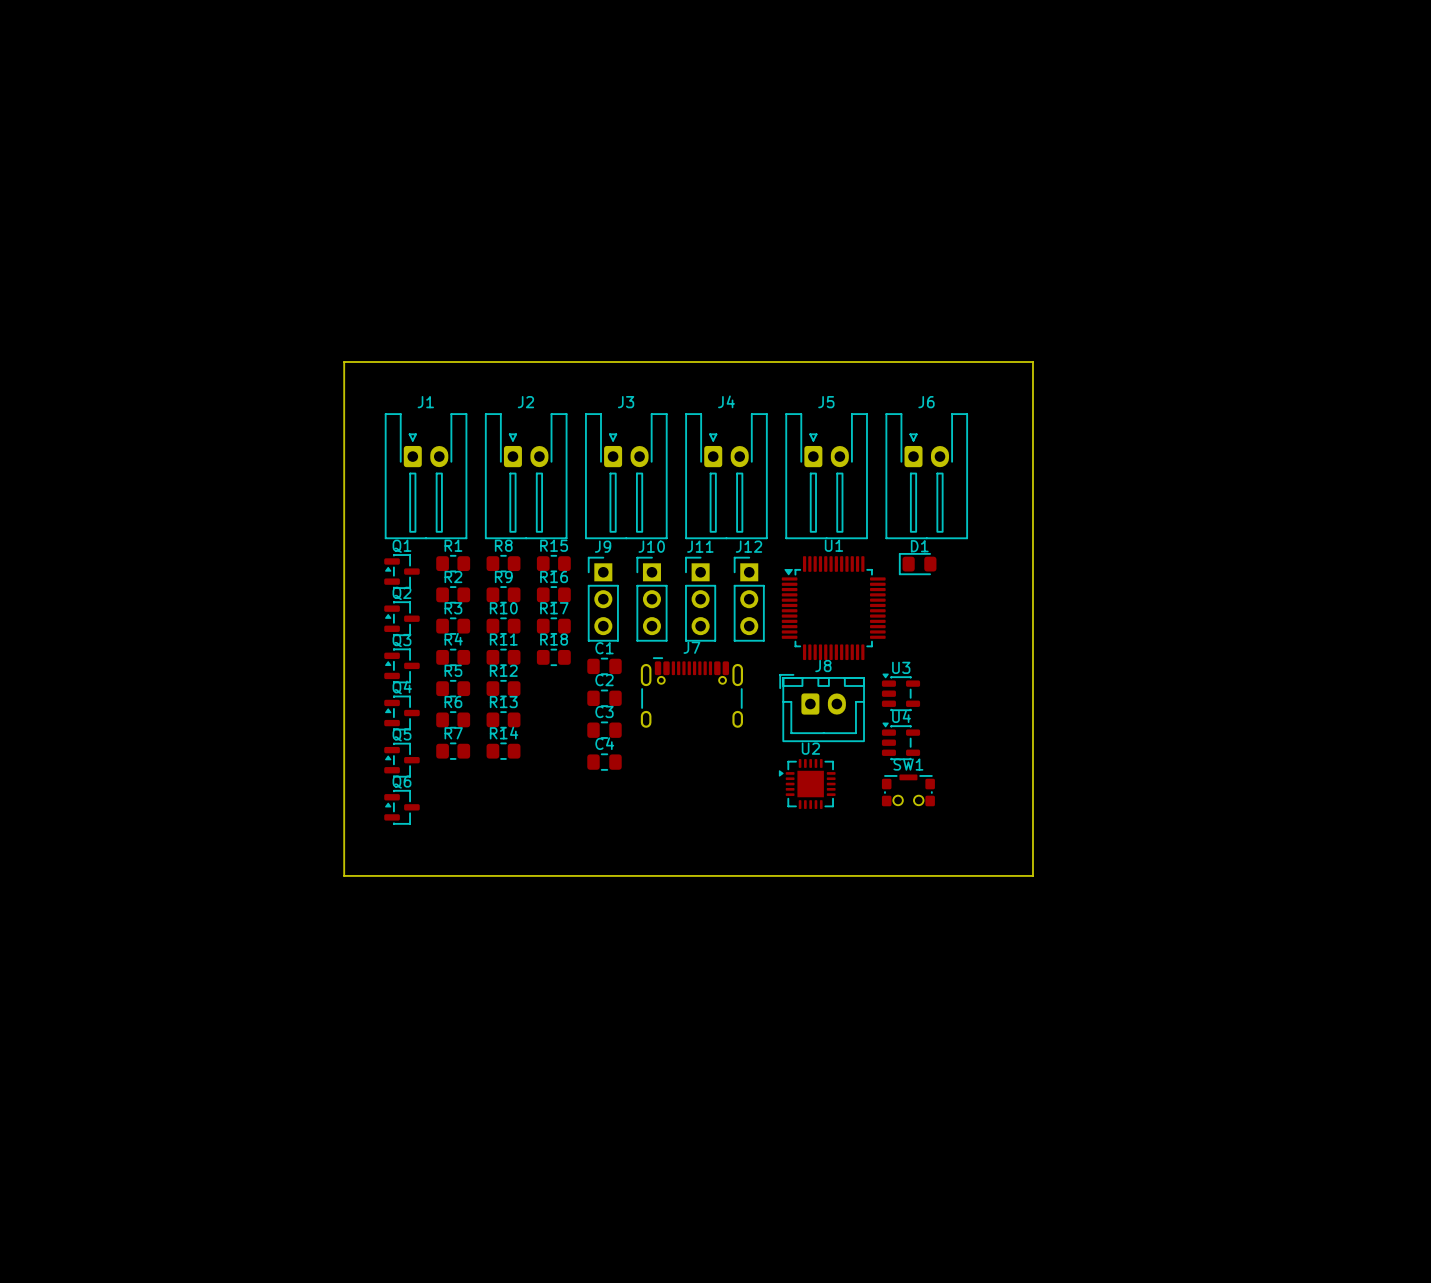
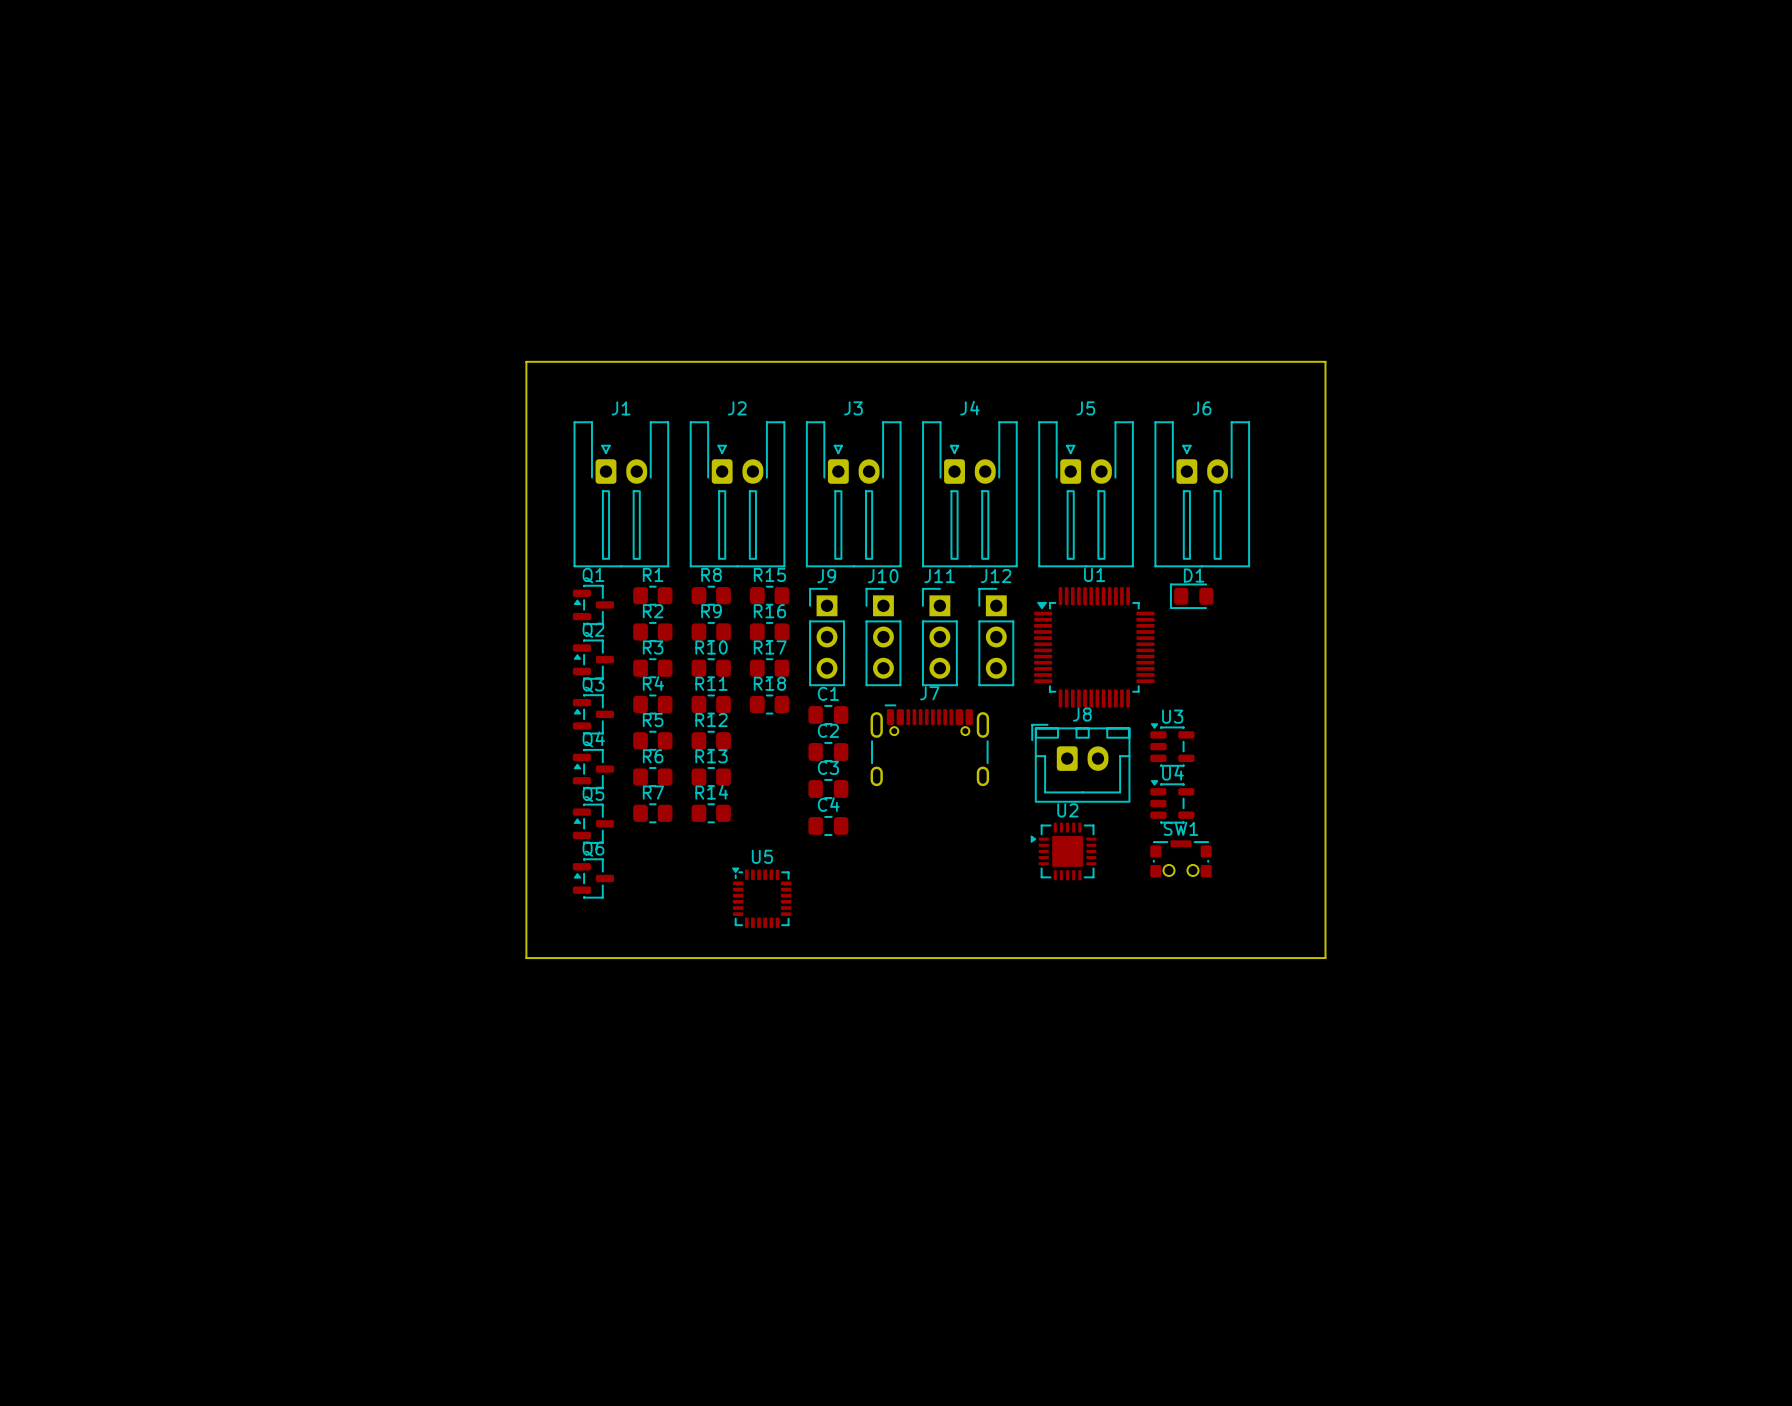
U5: none -> (761, 897)

